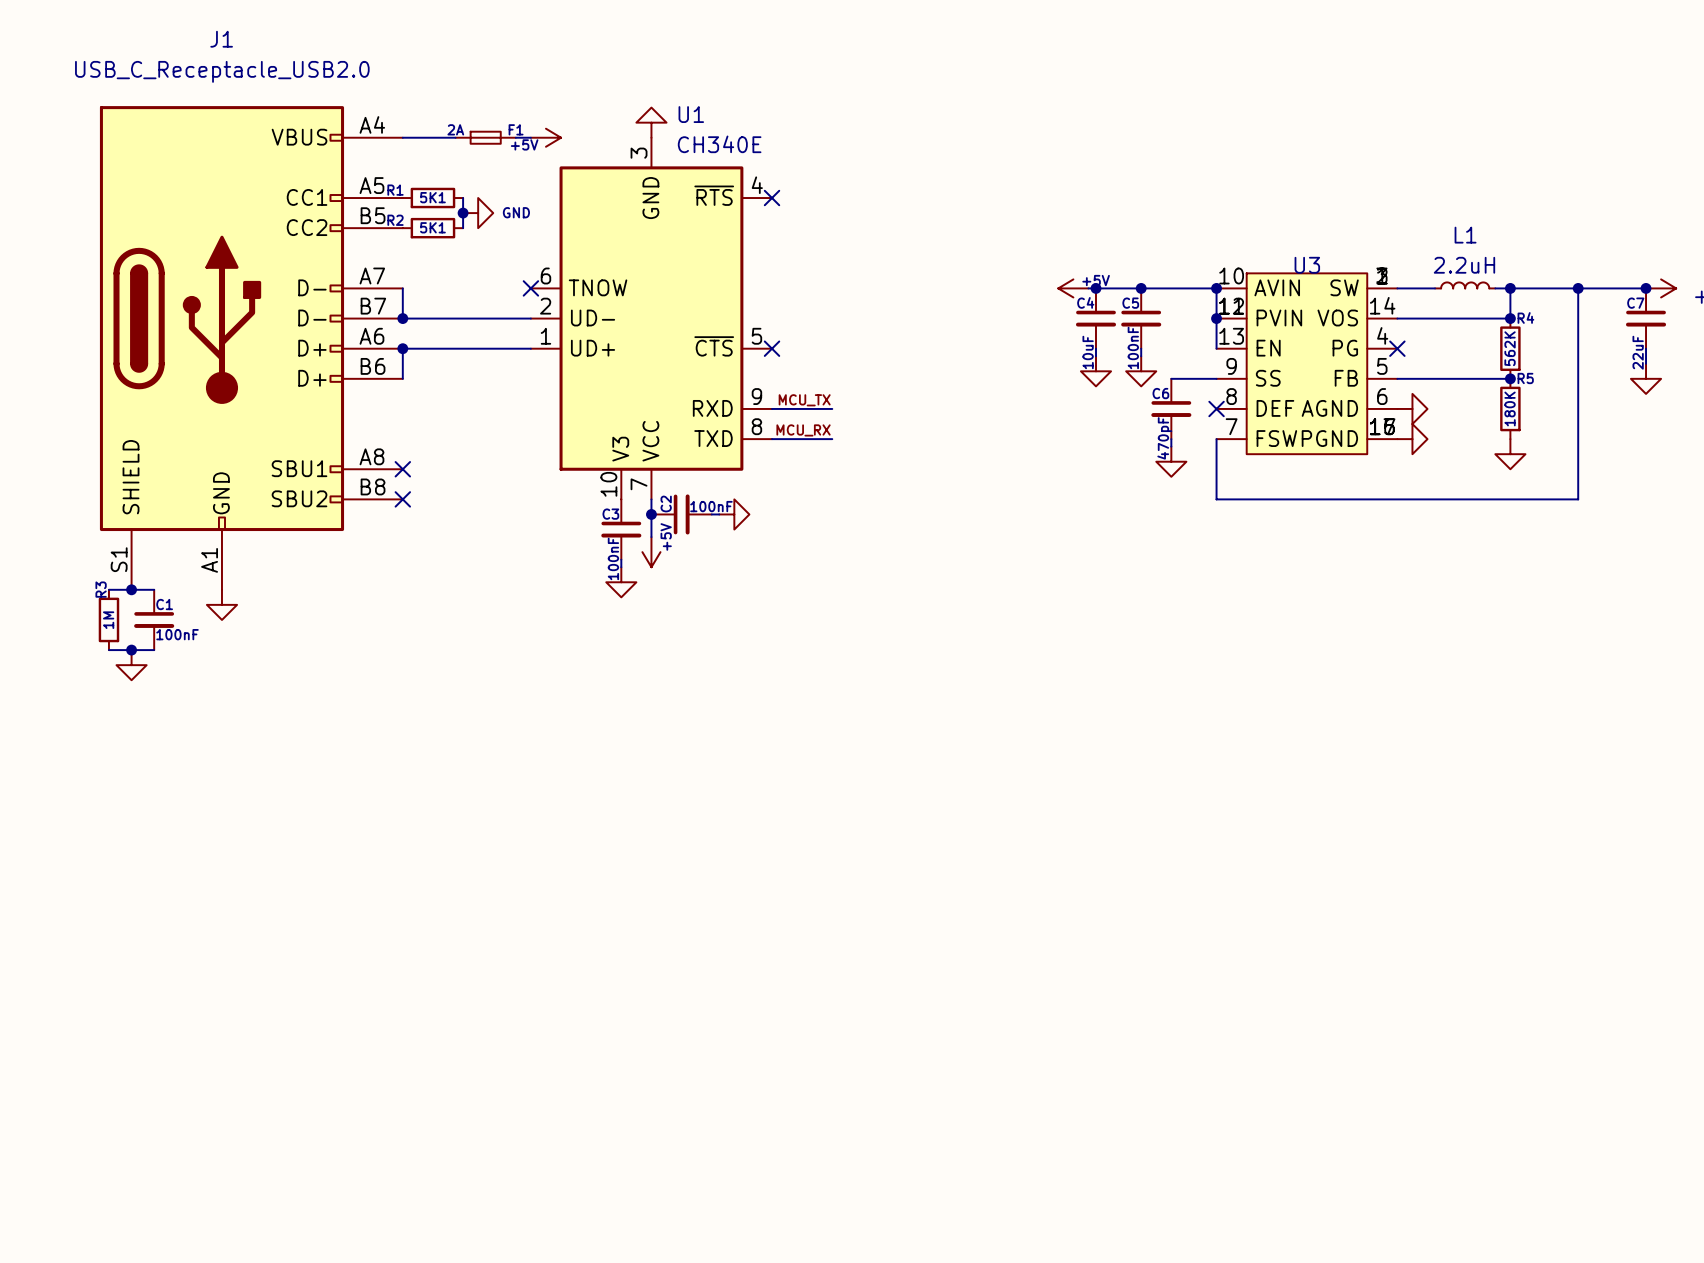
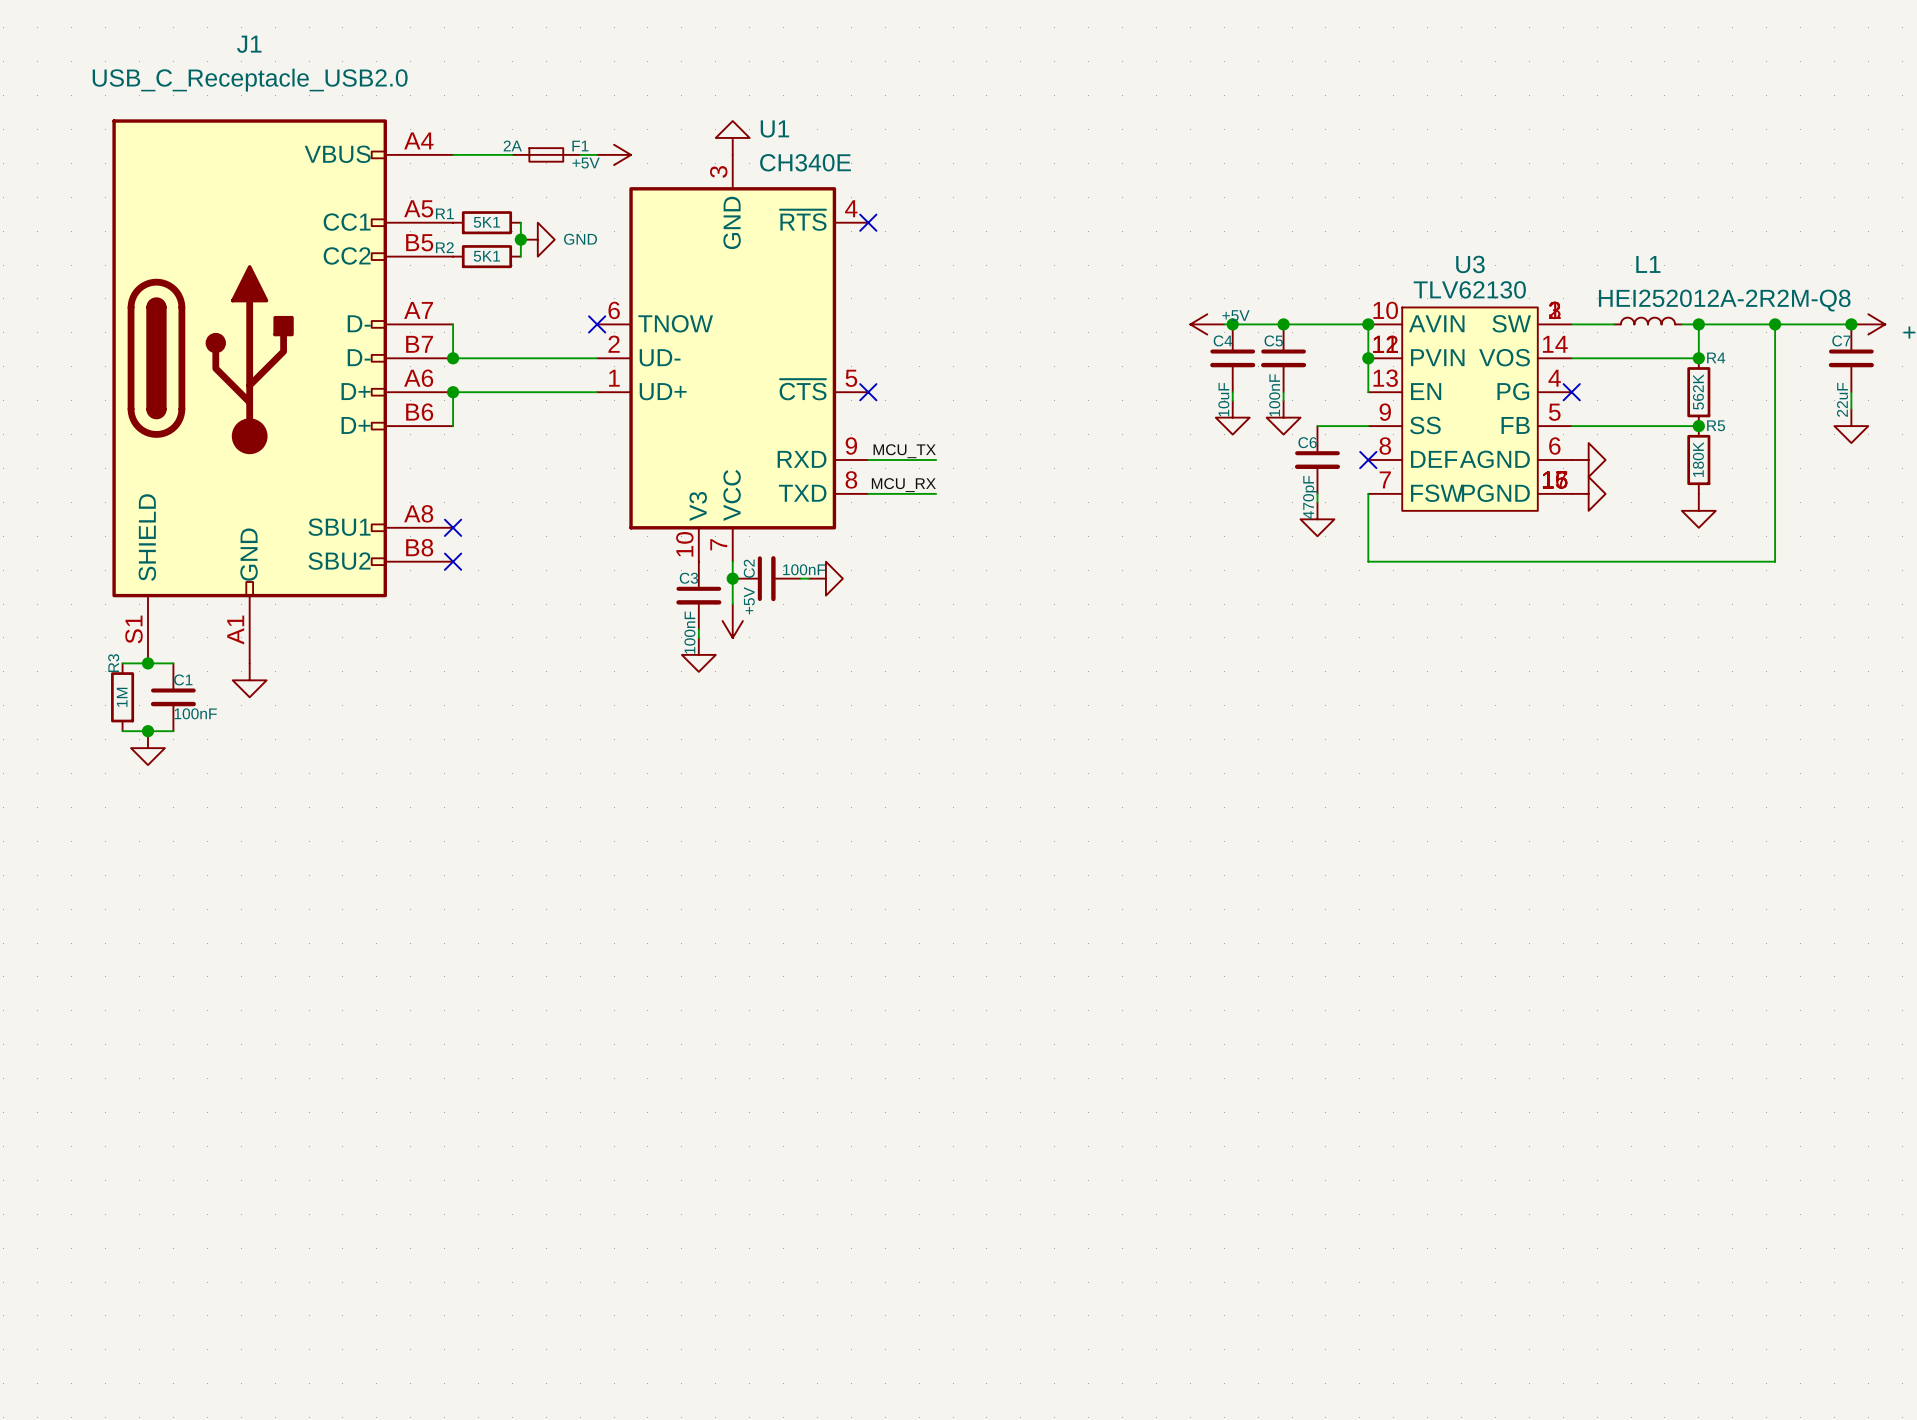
U3 value: none -> TLV62130 (1469, 289)
U3 name position: U3 (1307, 265) -> U3 (1470, 264)
L1 value: 2.2uH (1464, 265) -> HEI252012A-2R2M-Q8 (1724, 300)

